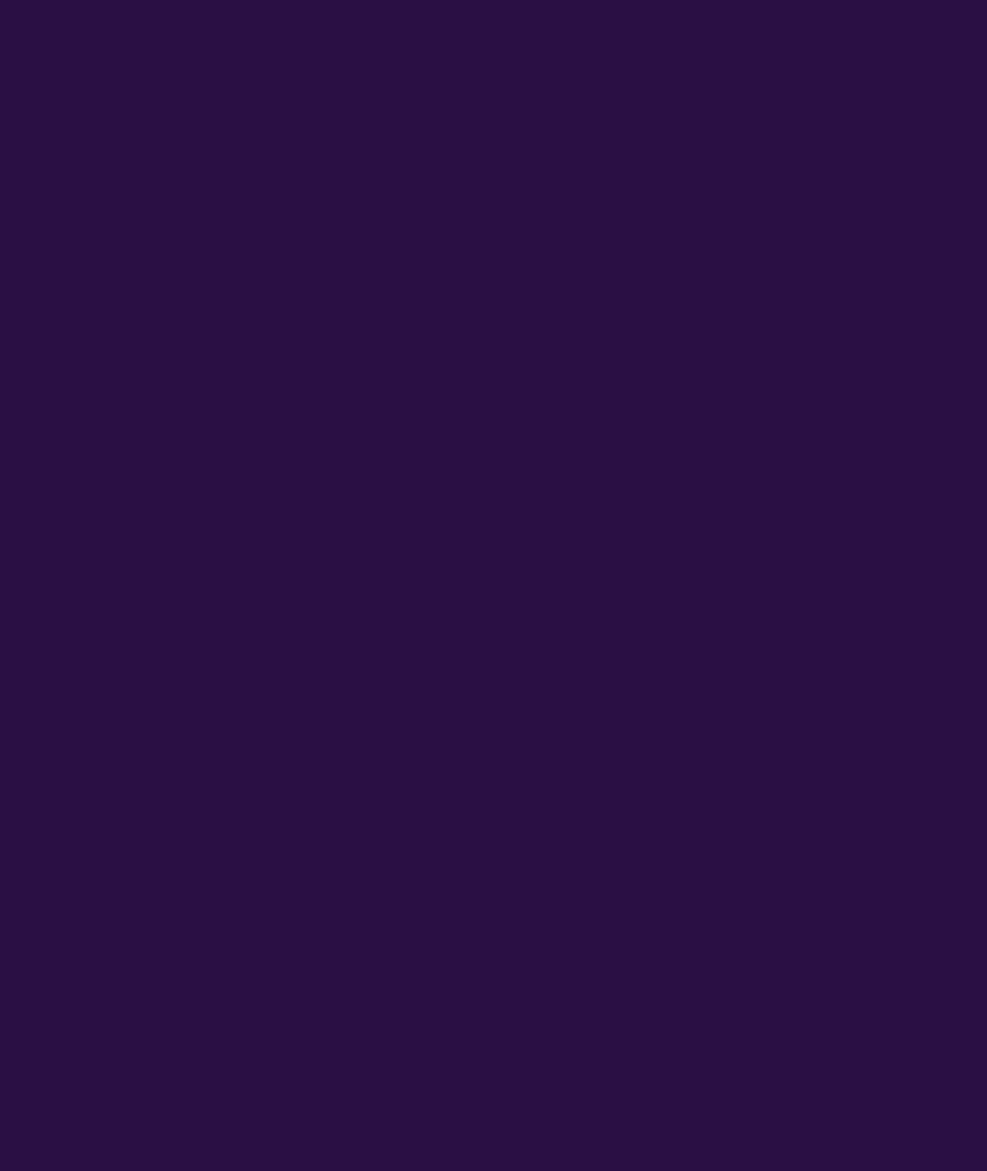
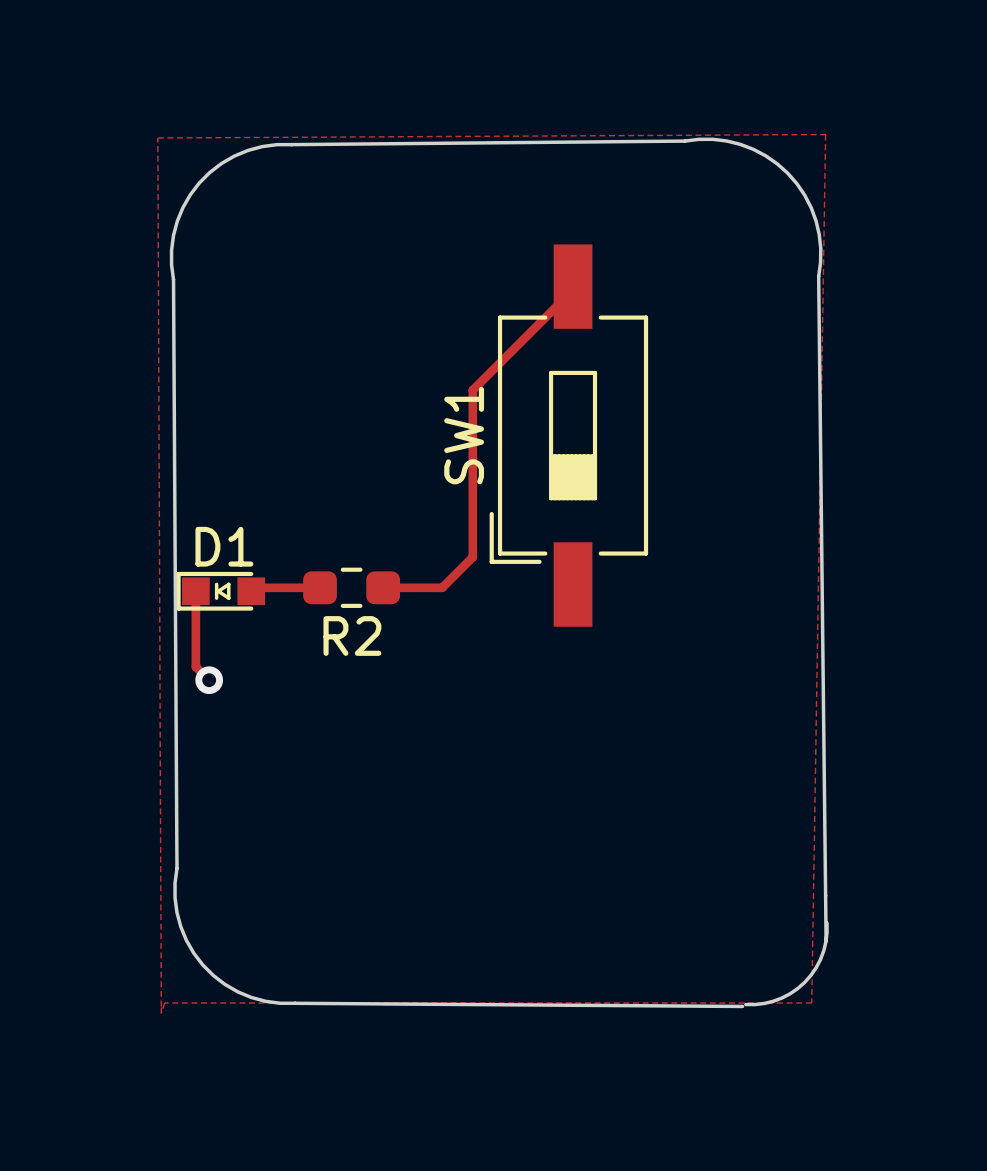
zone outline: none -> (825, 134) (157, 138) (161, 1013) (164, 1003) (811, 1003) (825, 134)
track: none -> (573, 286) (573, 289) (472, 390) (472, 557) (442, 587) (383, 587)
SW1: none -> (568, 435)
track: none -> (320, 587) (254, 587) (251, 591)
R2: none -> (351, 587)
track: none -> (195, 591) (195, 666) (209, 680)
D1: none -> (220, 591)
via: none -> (209, 680)
board edge: none -> (827, 923) (825, 941) (820, 959) (804, 982) (782, 997) (764, 1003) (745, 1004)
board edge: none -> (826, 940) (818, 276) (820, 248) (816, 220) (804, 195) (796, 183) (777, 163) (753, 149) (740, 144) (712, 139) (276, 144) (262, 146) (234, 156) (209, 172) (190, 194) (182, 207) (173, 235) (171, 250) (173, 279) (176, 868) (175, 897) (180, 926) (193, 953) (213, 975) (237, 991) (251, 997) (280, 1003) (742, 1006)

